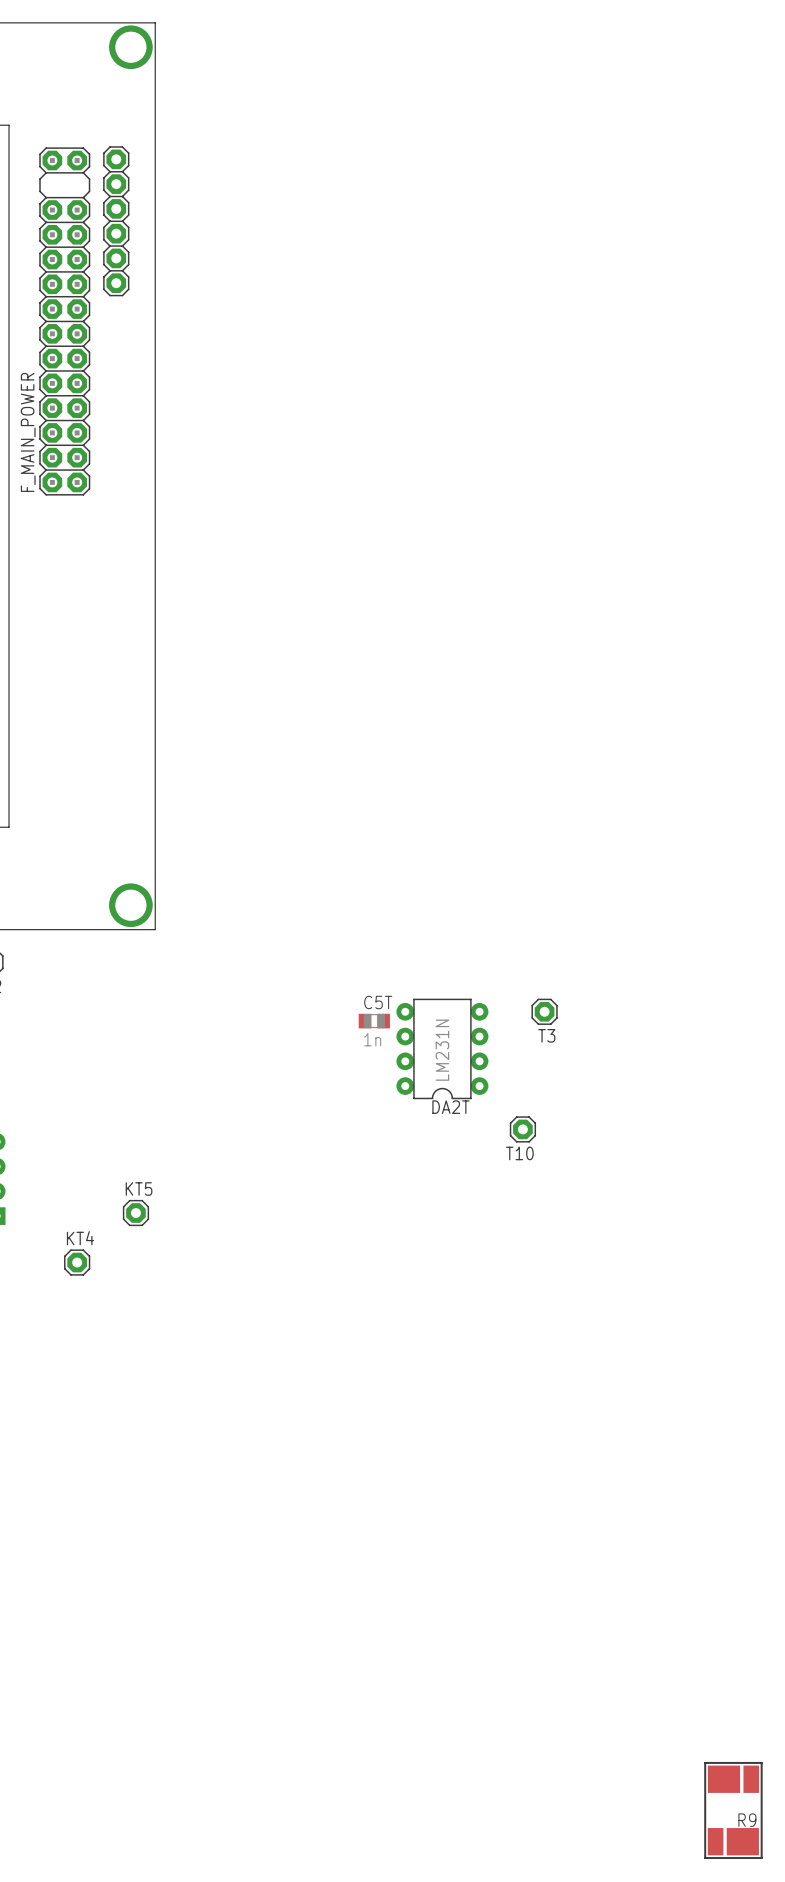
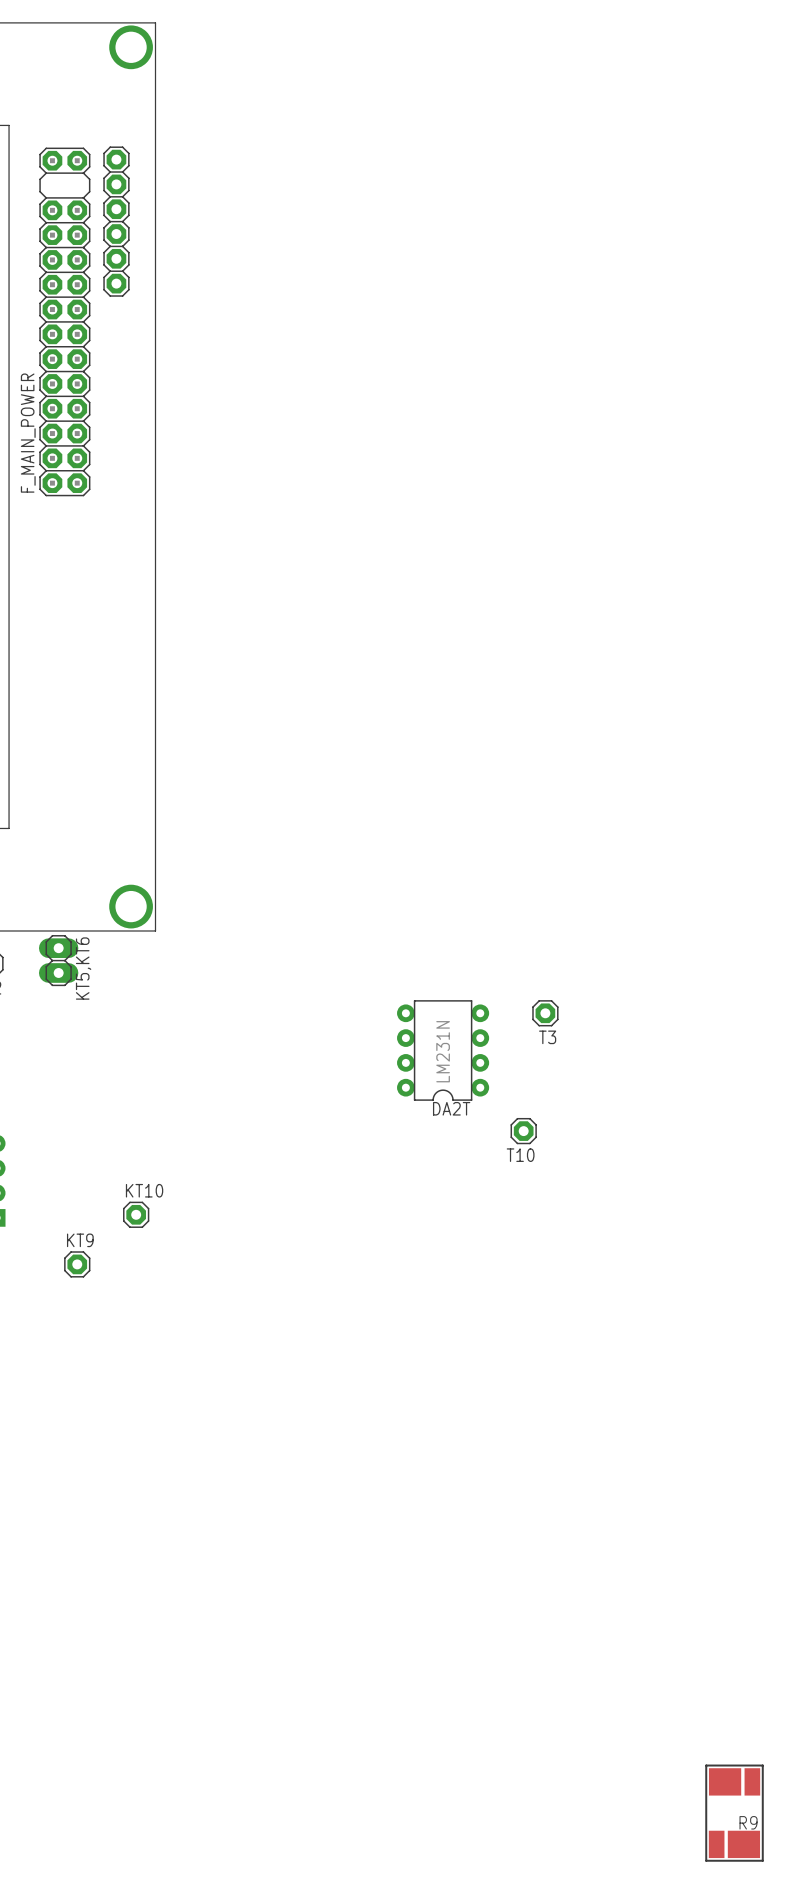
KT5,KT6: none -> (58, 960)
C5T: 1n (374, 1021) -> none
KT5 name: KT5 (139, 1188) -> KT10 (144, 1190)
KT4 name: KT4 (80, 1238) -> KT9 (80, 1240)

